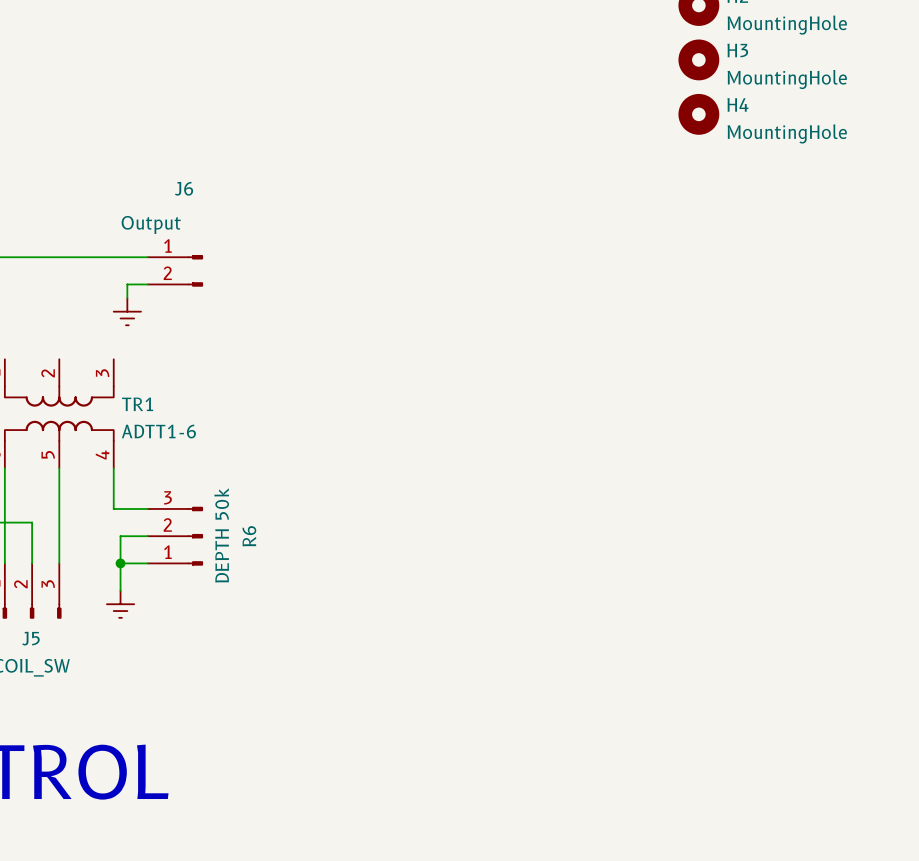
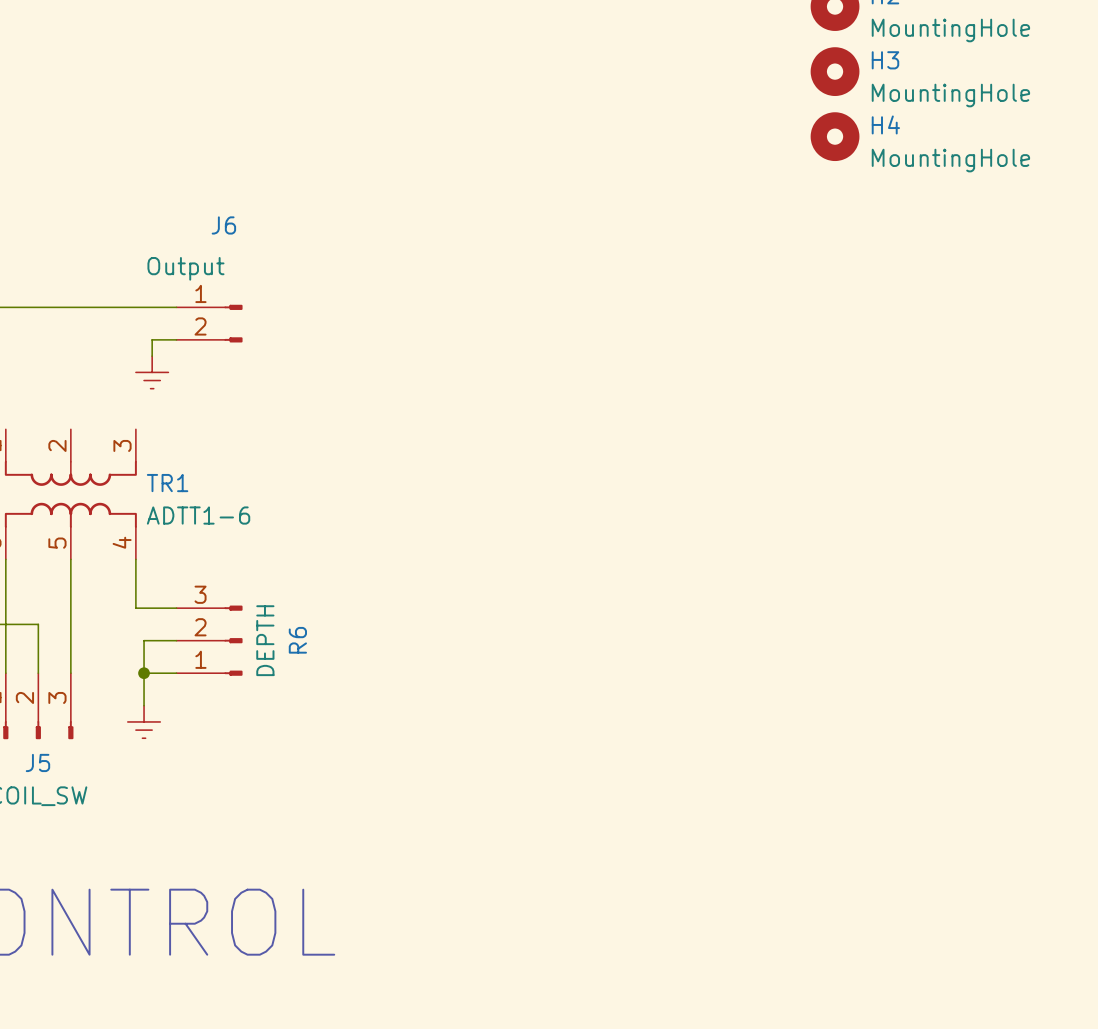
R6 value: DEPTH 50k (221, 535) -> DEPTH (265, 640)

